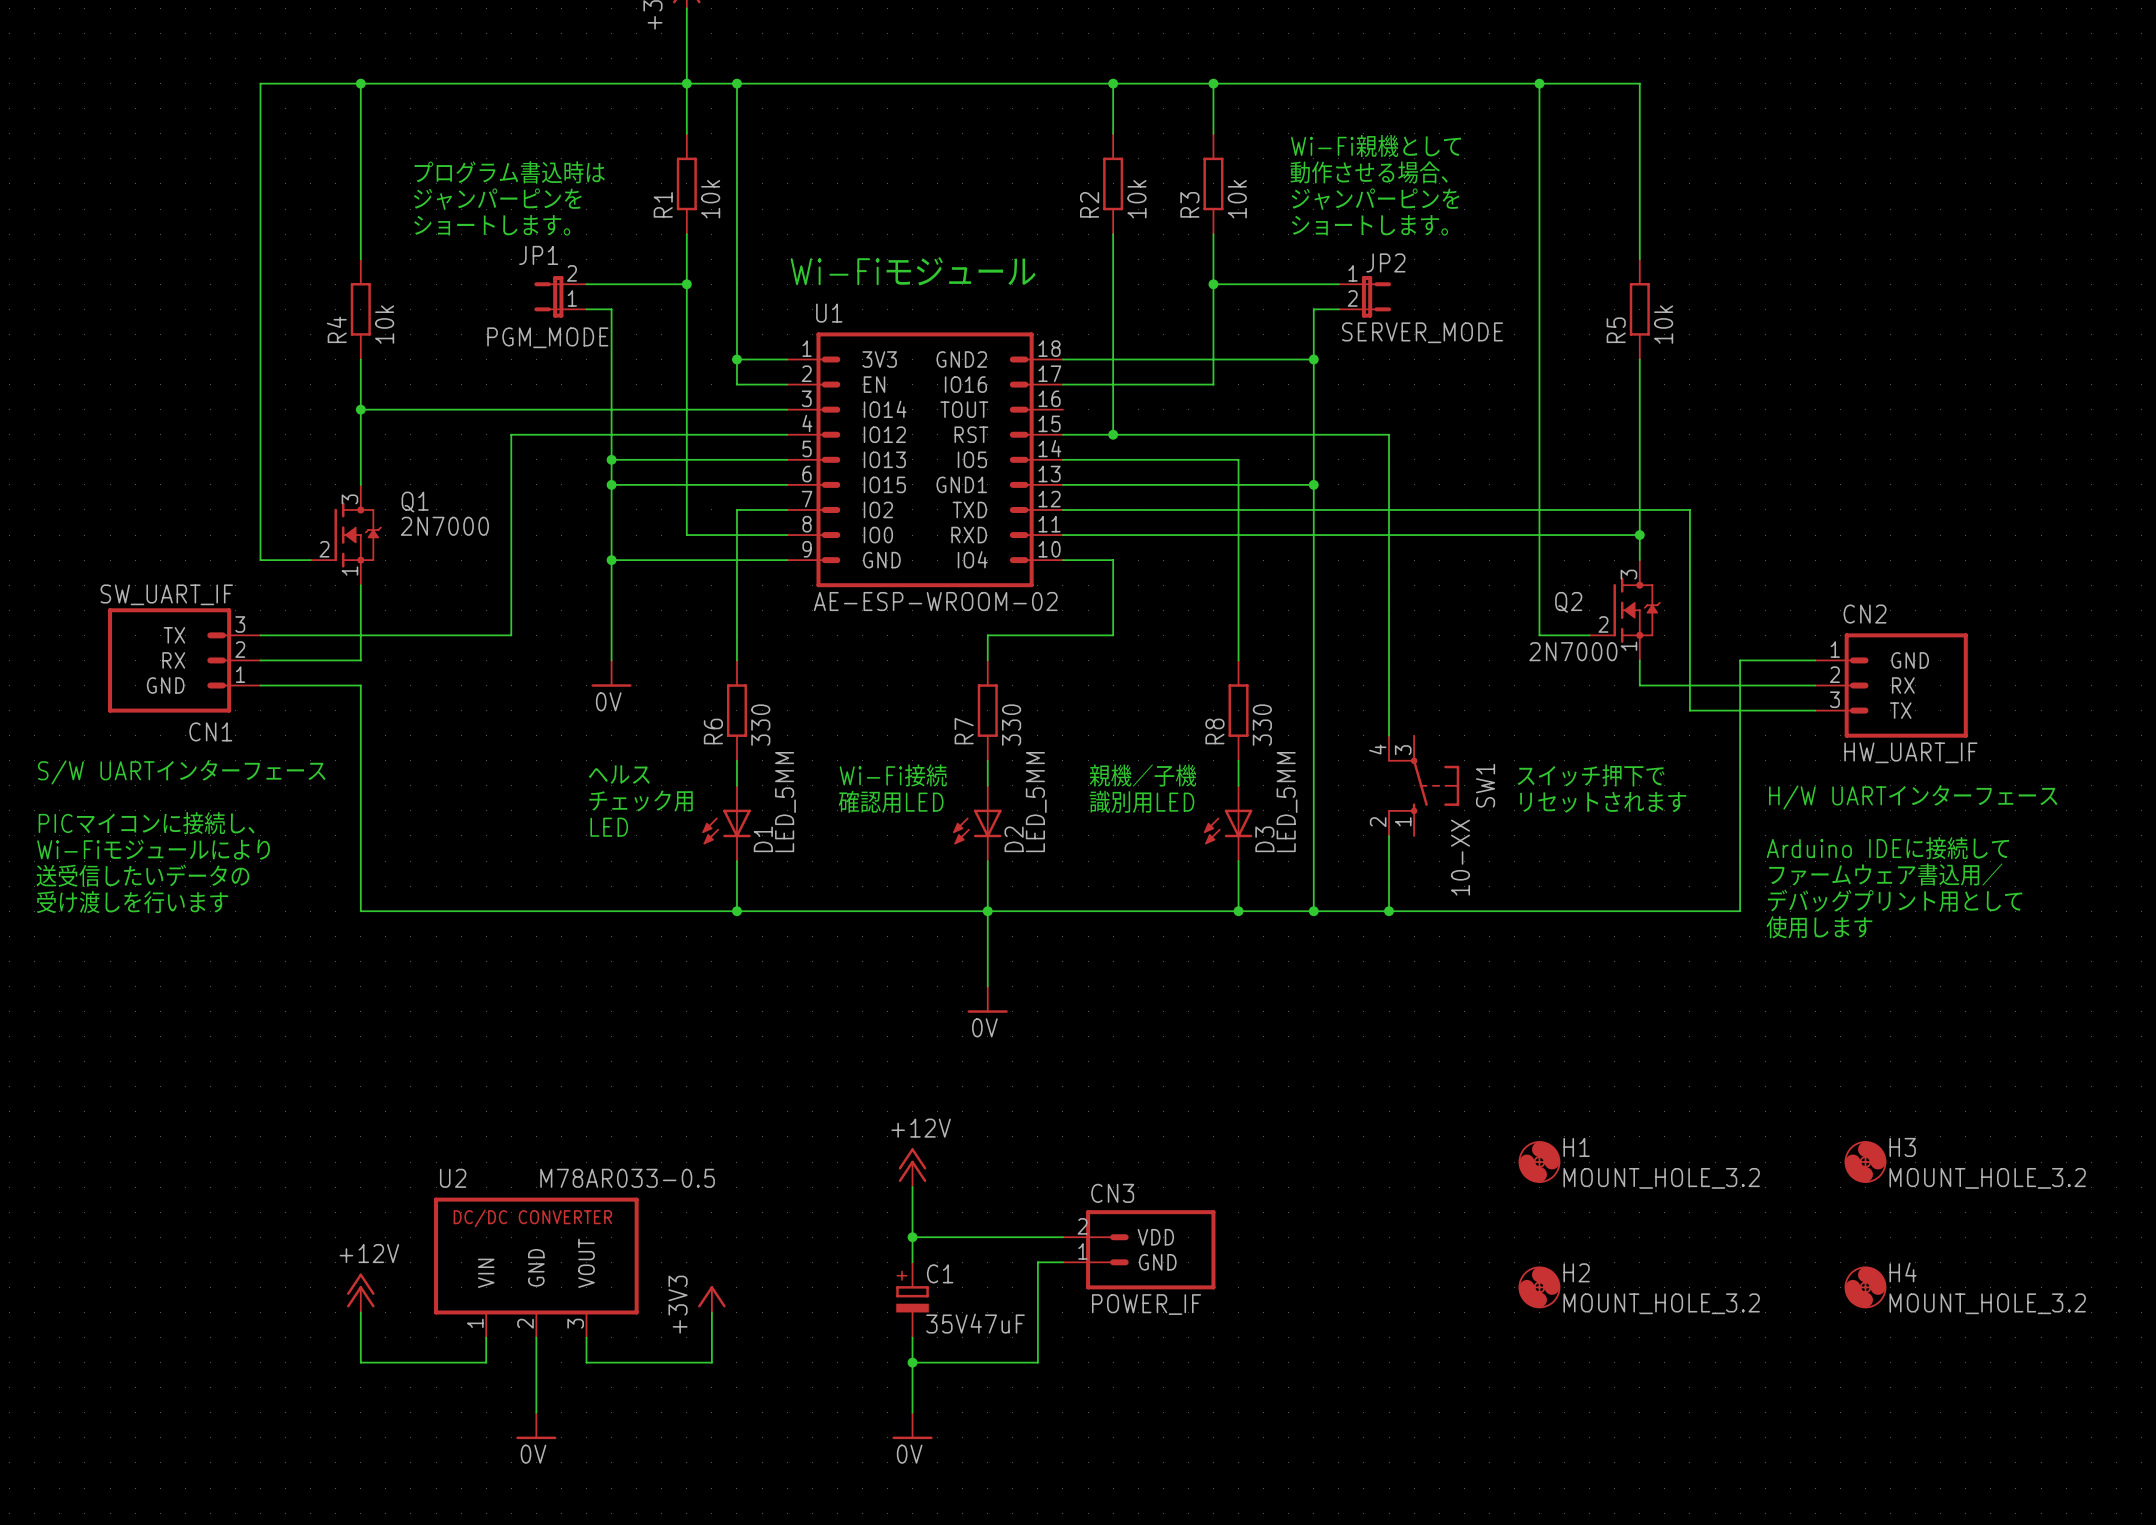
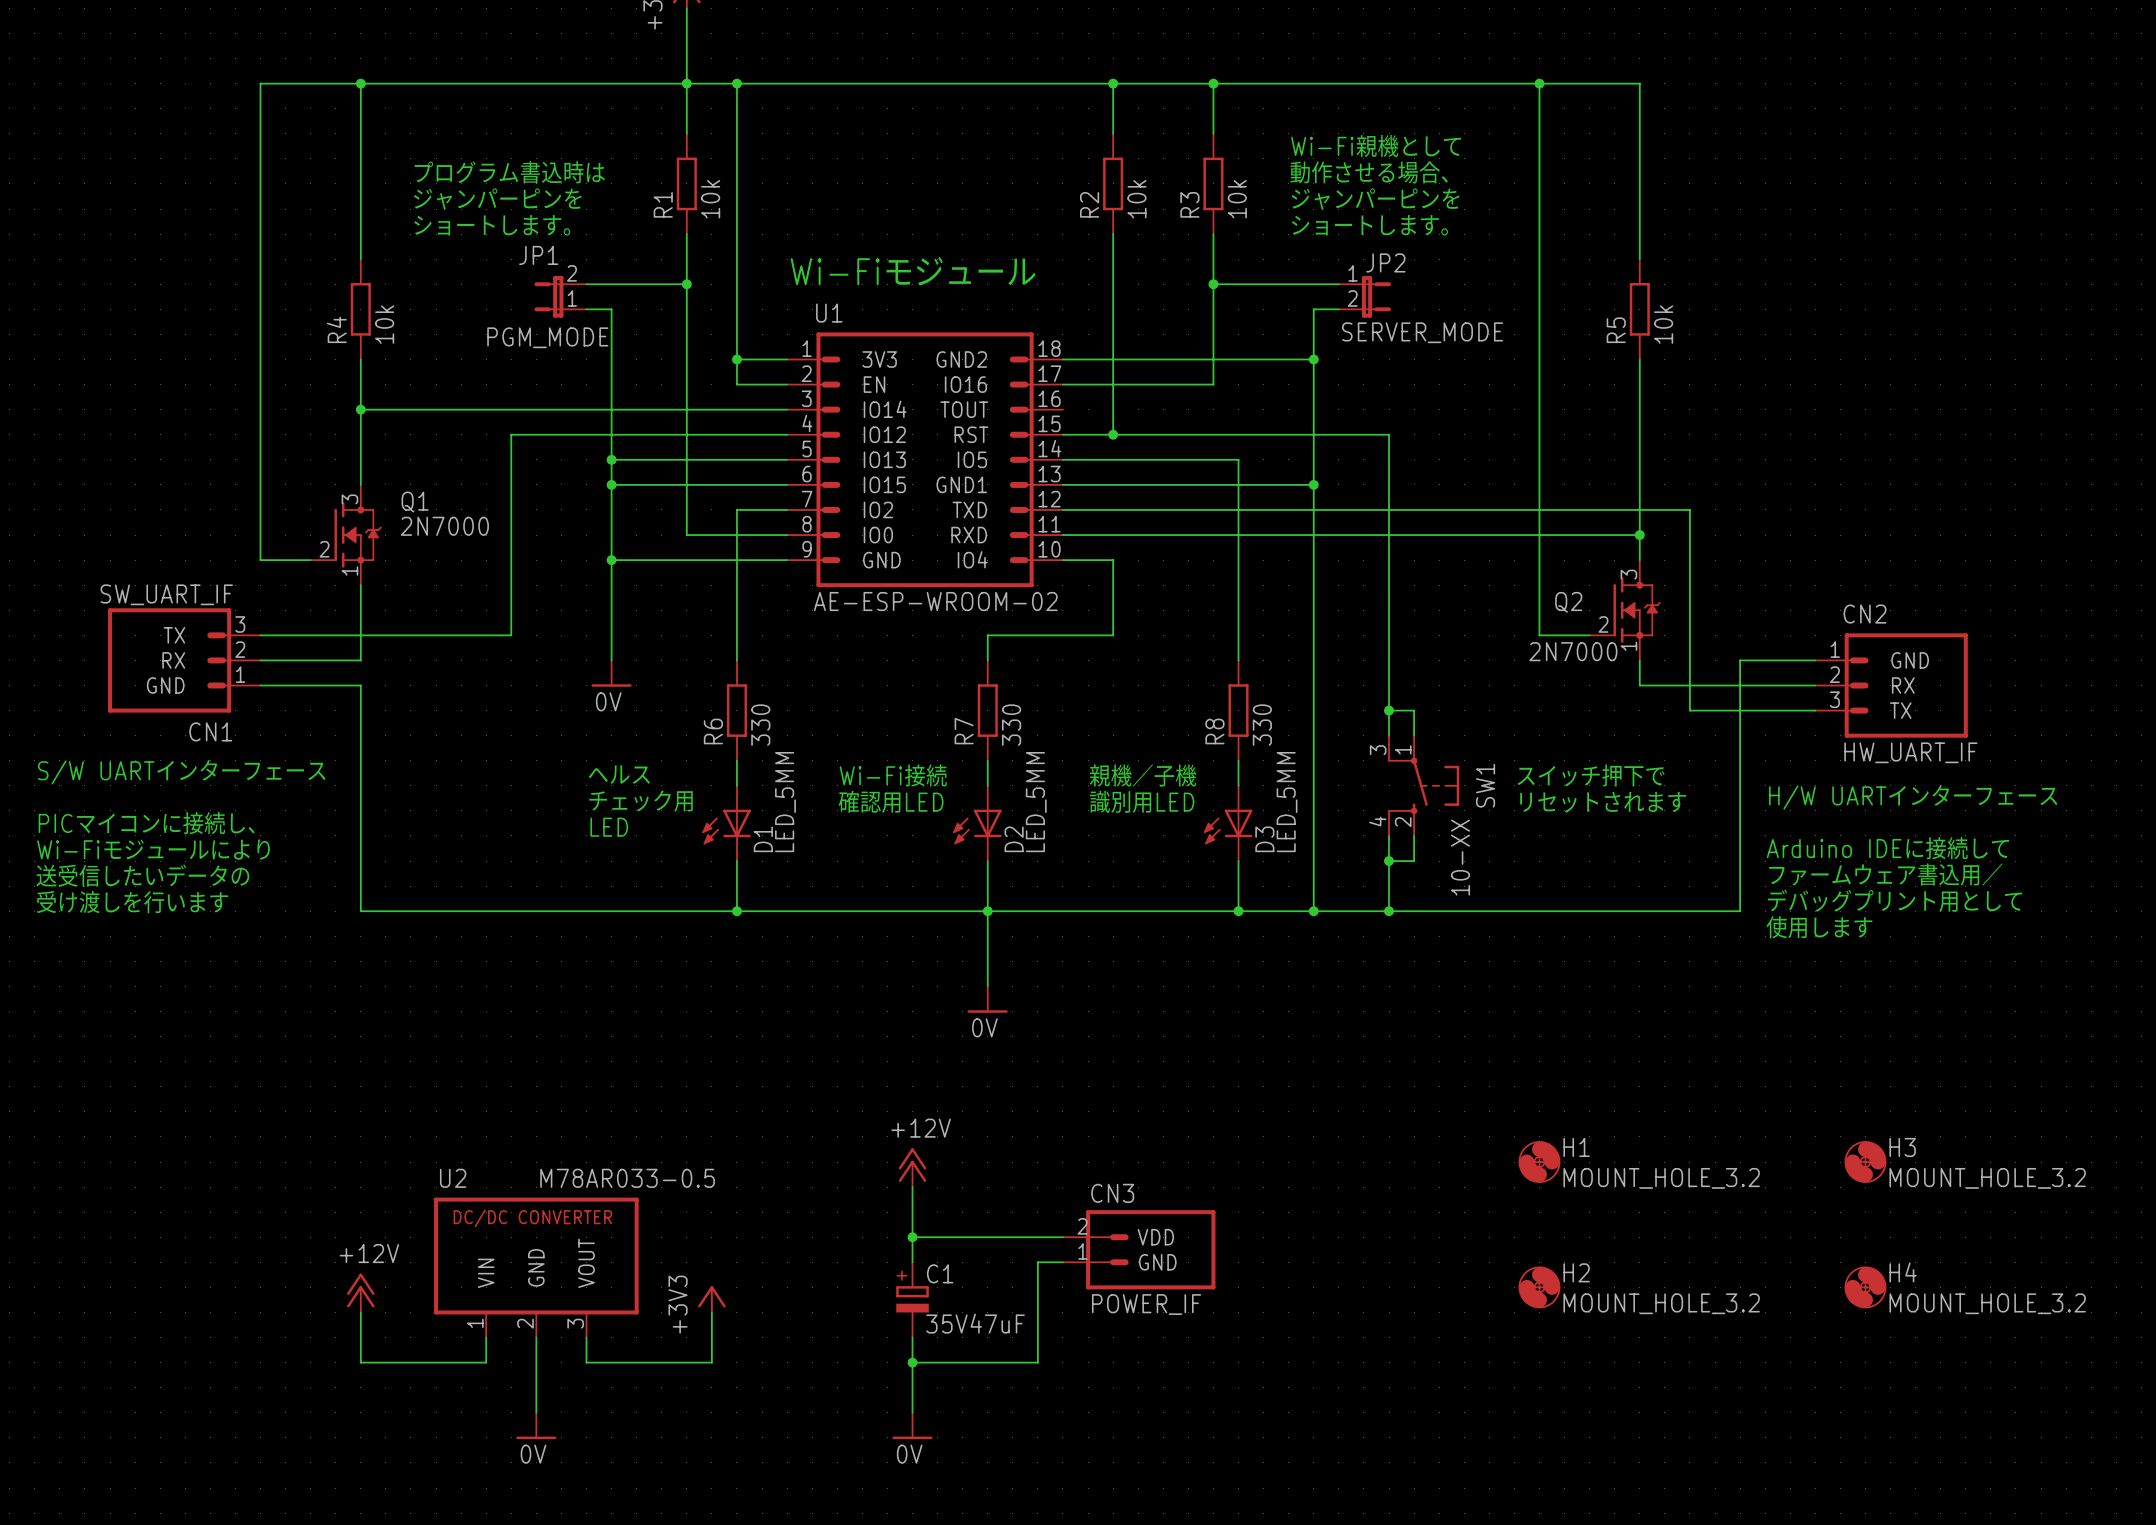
wire: none -> (1389, 710) (1414, 710) (1414, 735)
junction: none -> (1389, 710)
SW1 pin number: 4 (1377, 749) -> 3 (1378, 750)
SW1 pin number: 3 (1403, 750) -> 1 (1403, 749)
SW1 pin number: 1 (1403, 821) -> 2 (1403, 822)
SW1 pin number: 2 (1378, 822) -> 4 (1377, 821)
wire: none -> (1414, 835) (1414, 861) (1389, 861)
junction: none -> (1389, 861)

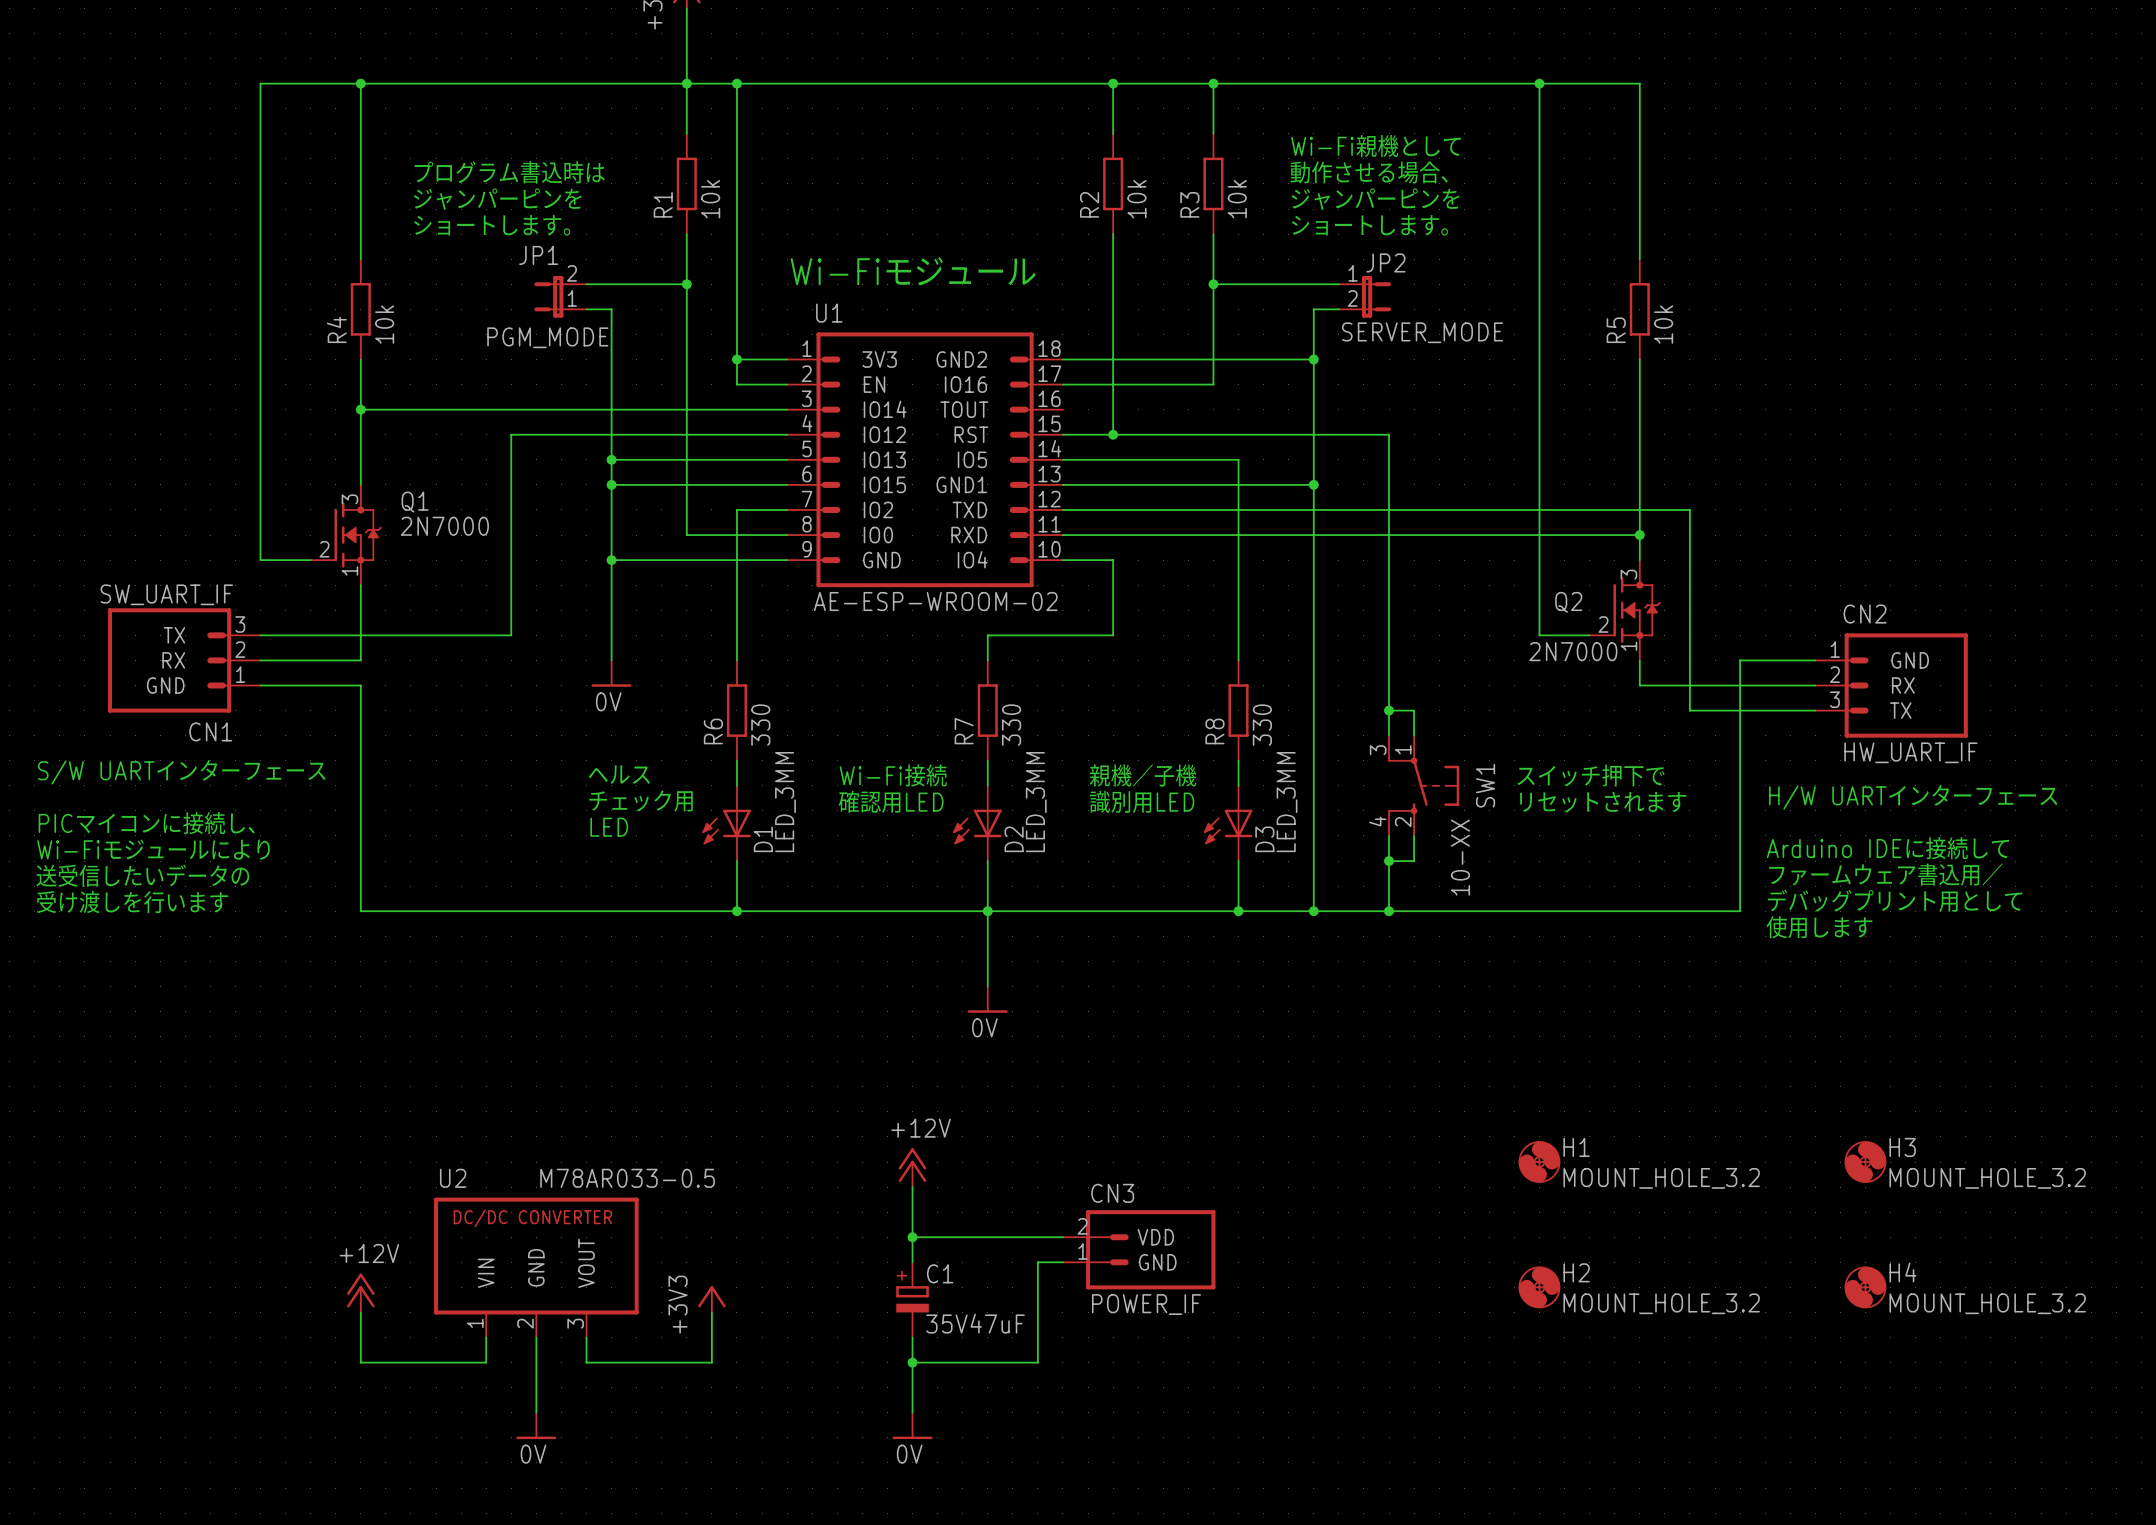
D1 value: LED_5MM (785, 802) -> LED_3MM (785, 802)
D2 value: LED_5MM (1036, 802) -> LED_3MM (1036, 802)
D3 value: LED_5MM (1287, 802) -> LED_3MM (1287, 802)

